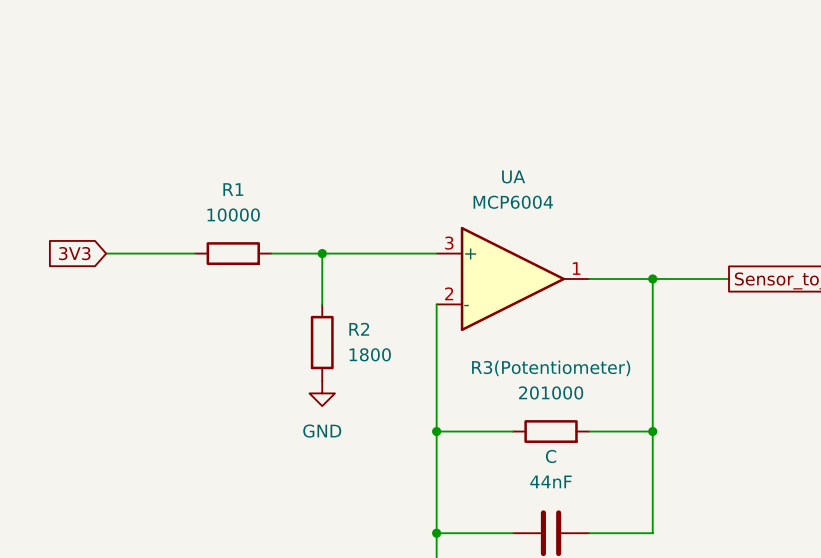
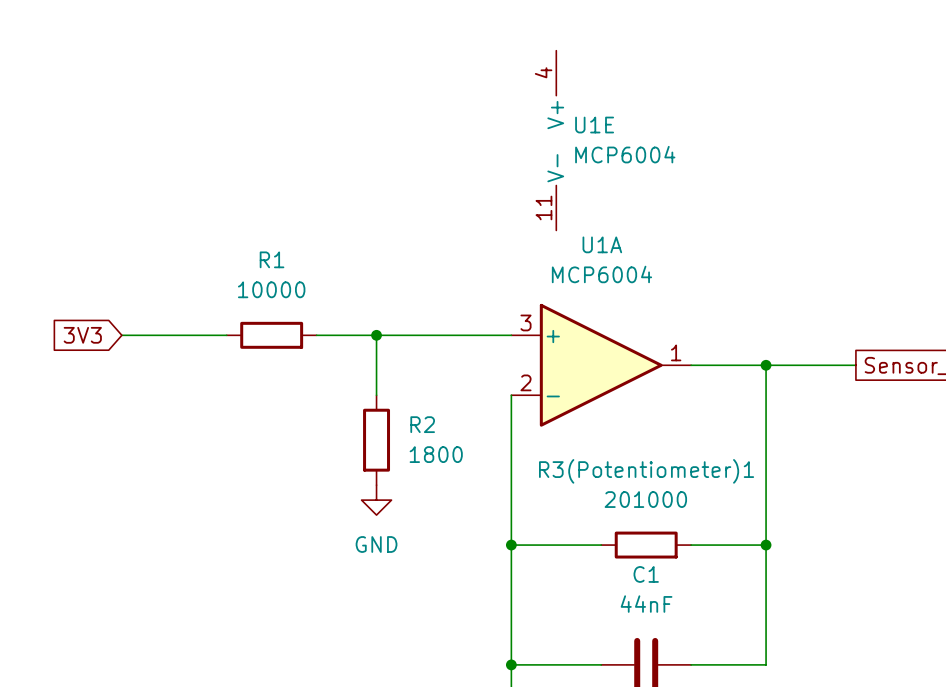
U1E: none -> MCP6004 (556, 140)
UA name: UA (513, 176) -> U1A (602, 244)
R3(Potentiometer) name: R3(Potentiometer) (551, 368) -> R3(Potentiometer)1 (646, 471)
C name: C (551, 456) -> C1 (646, 574)

